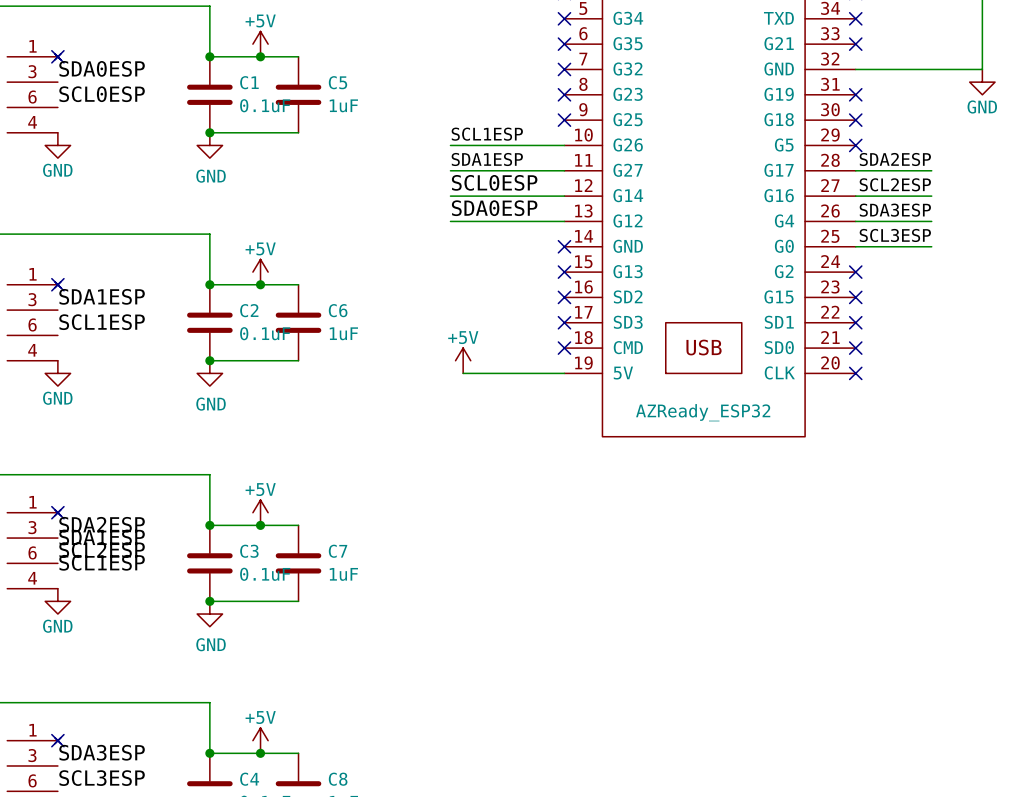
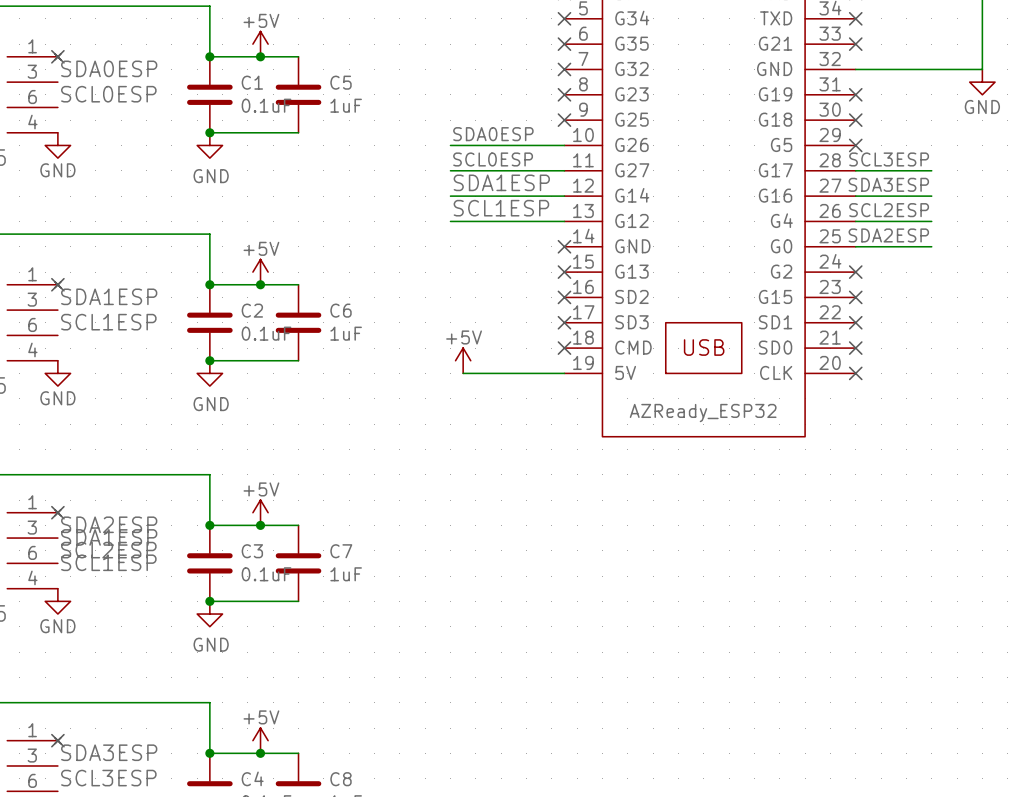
label: SCL1ESP (487, 134) -> SDA0ESP (493, 134)
label: SDA1ESP (487, 159) -> SCL0ESP (493, 159)
label: SDA2ESP (895, 159) -> SCL3ESP (889, 159)
label: SCL0ESP (494, 182) -> SDA1ESP (501, 182)
label: SCL2ESP (895, 184) -> SDA3ESP (888, 184)
label: SDA0ESP (494, 208) -> SCL1ESP (501, 208)
label: SDA3ESP (895, 210) -> SCL2ESP (889, 210)
label: SCL3ESP (895, 235) -> SDA2ESP (888, 235)

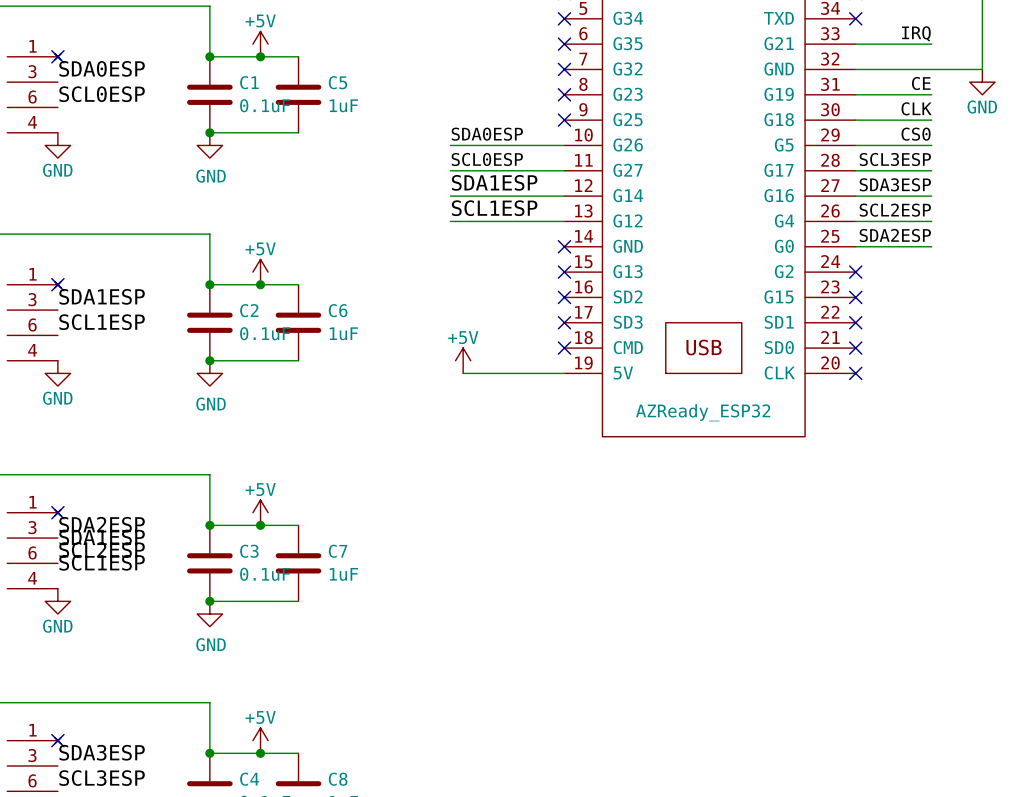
label: none -> IRQ (916, 33)
wire: none -> (855, 44) (931, 44)
no-connect mark: (855, 44) -> none
label: none -> CE (921, 83)
wire: none -> (855, 94) (931, 94)
no-connect mark: (855, 94) -> none
label: none -> CLK (916, 108)
wire: none -> (855, 120) (931, 120)
no-connect mark: (855, 120) -> none
label: none -> CS0 (916, 134)
wire: none -> (855, 145) (931, 145)
no-connect mark: (855, 145) -> none

